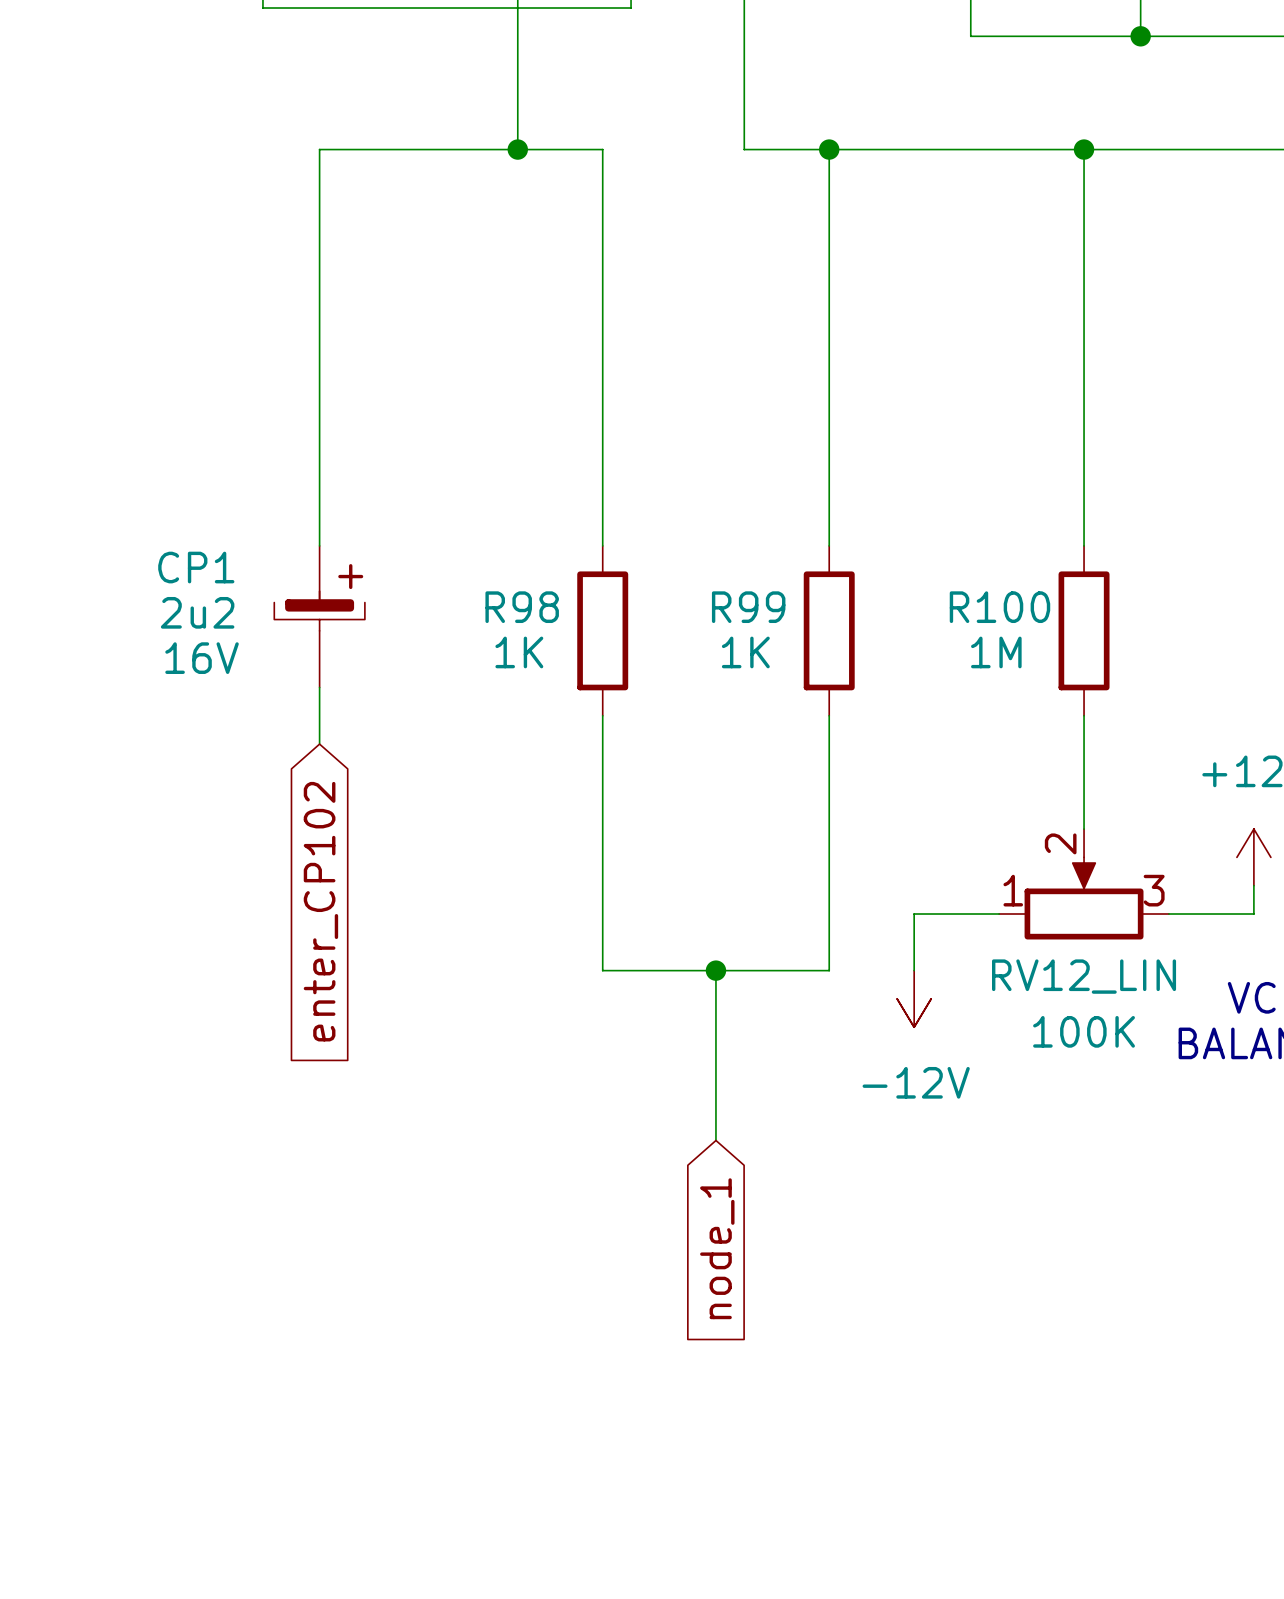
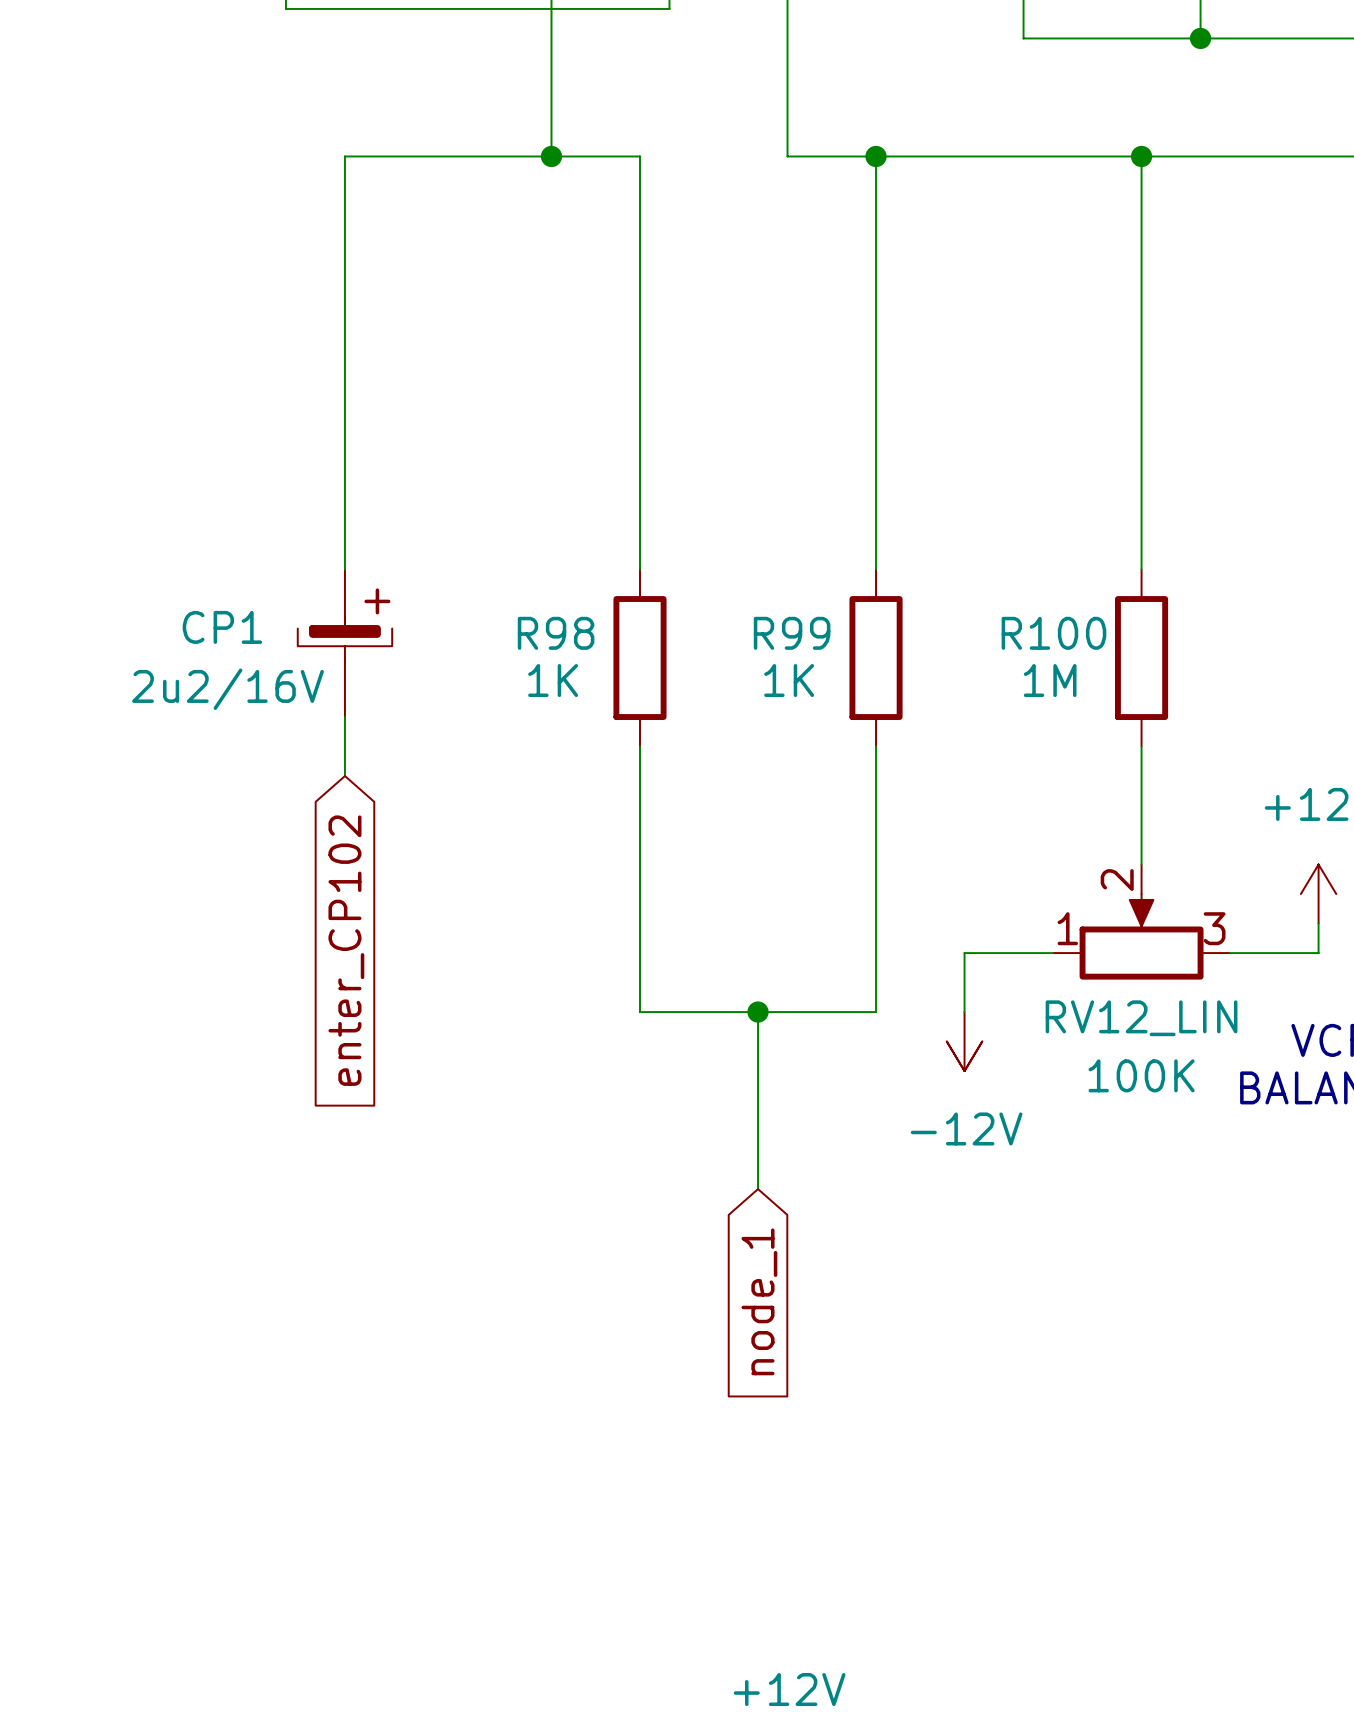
CP1 name position: CP1 (196, 567) -> CP1 (222, 627)
CP1 value: 2u2 (197, 612) -> 2u2/16V (228, 689)
CP1 text: 16V (202, 658) -> none

